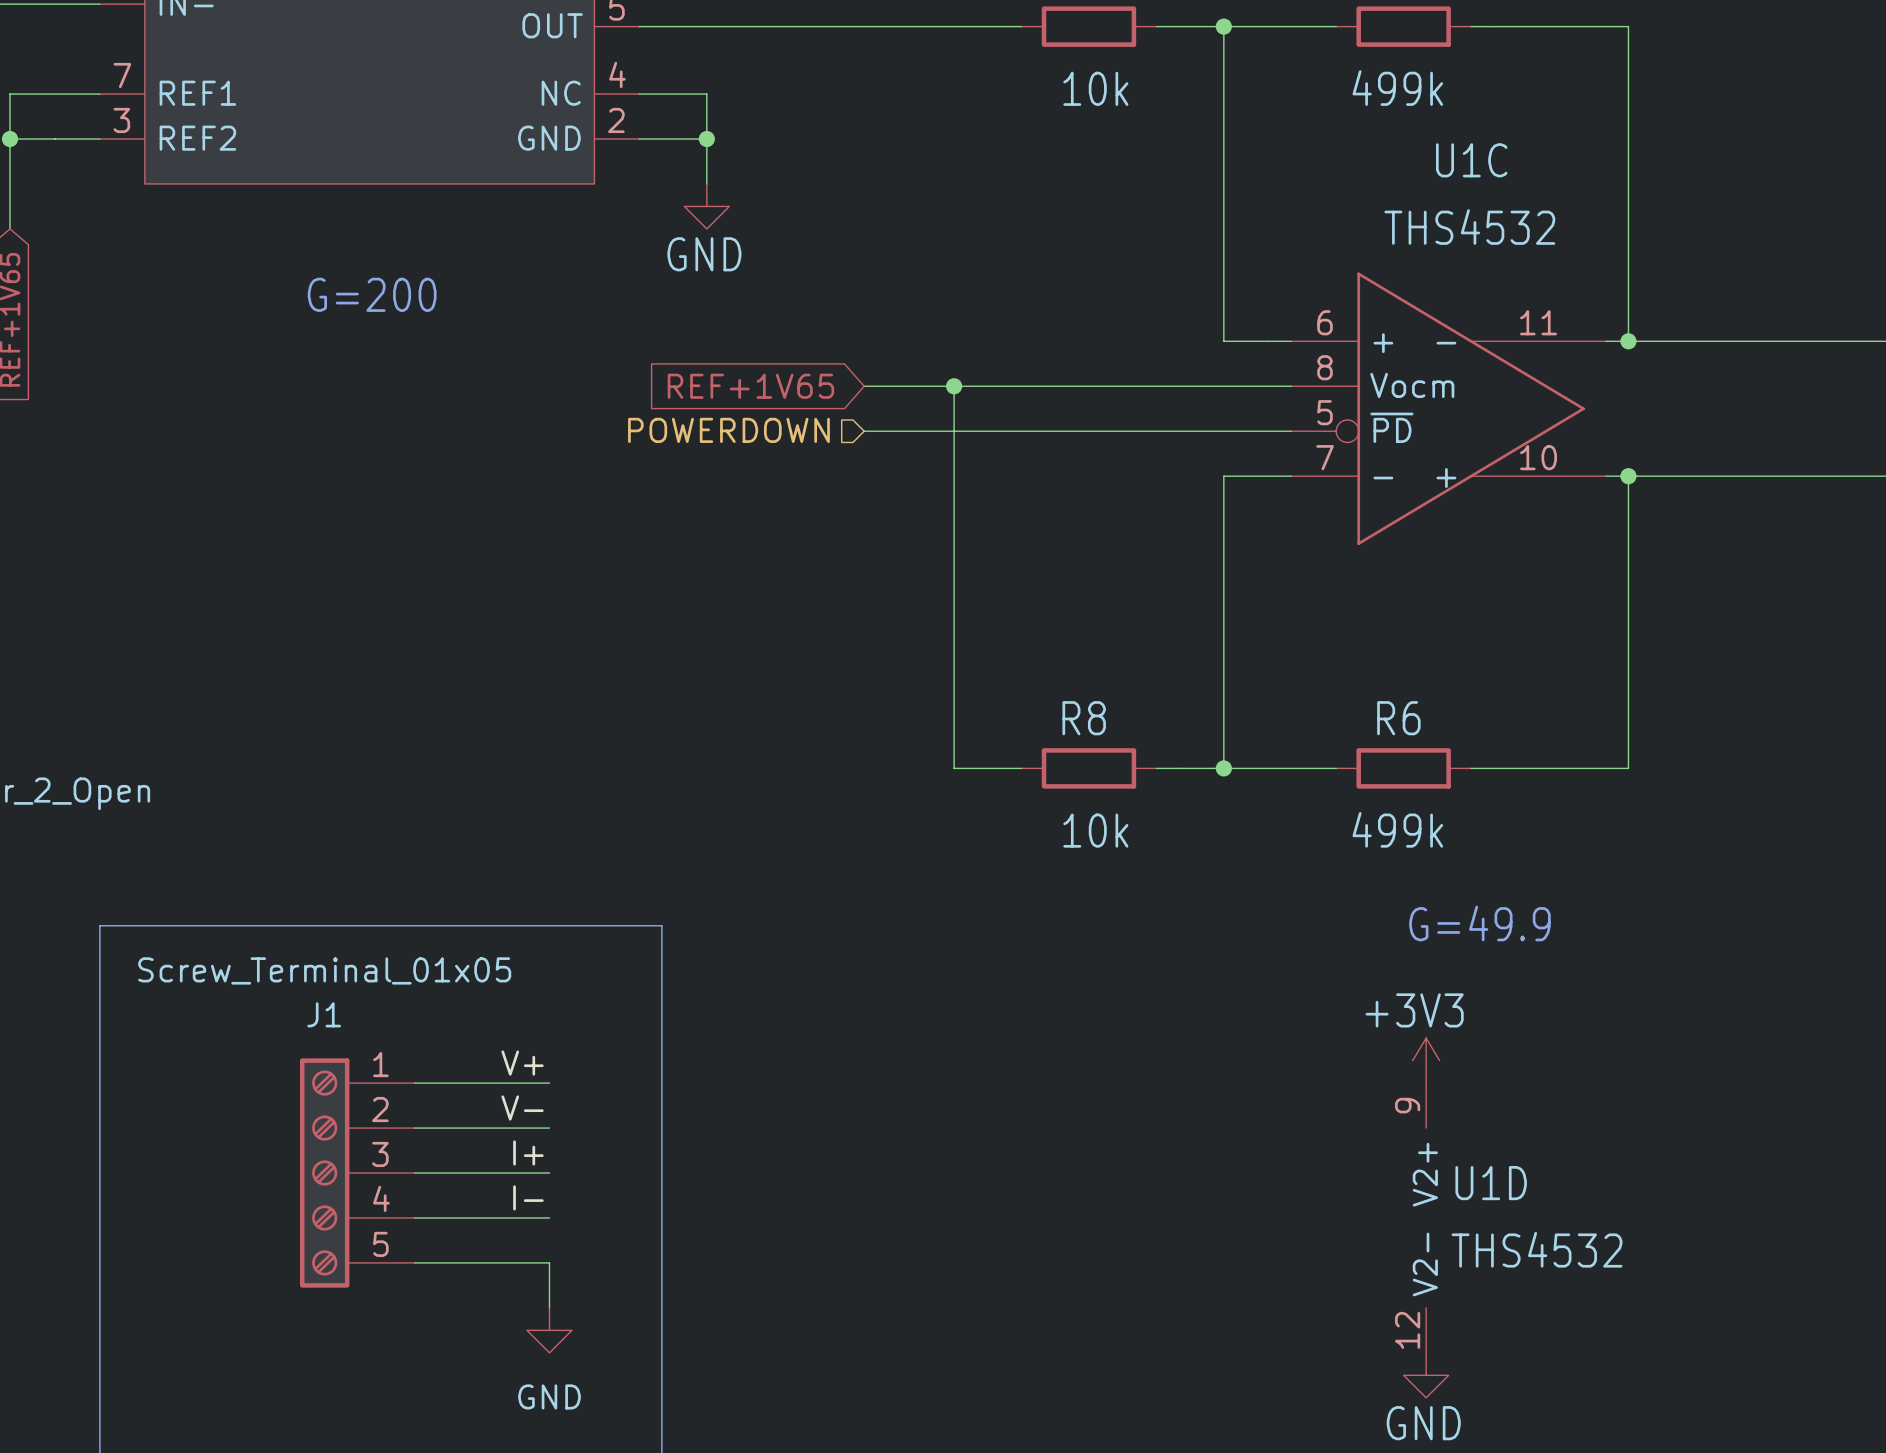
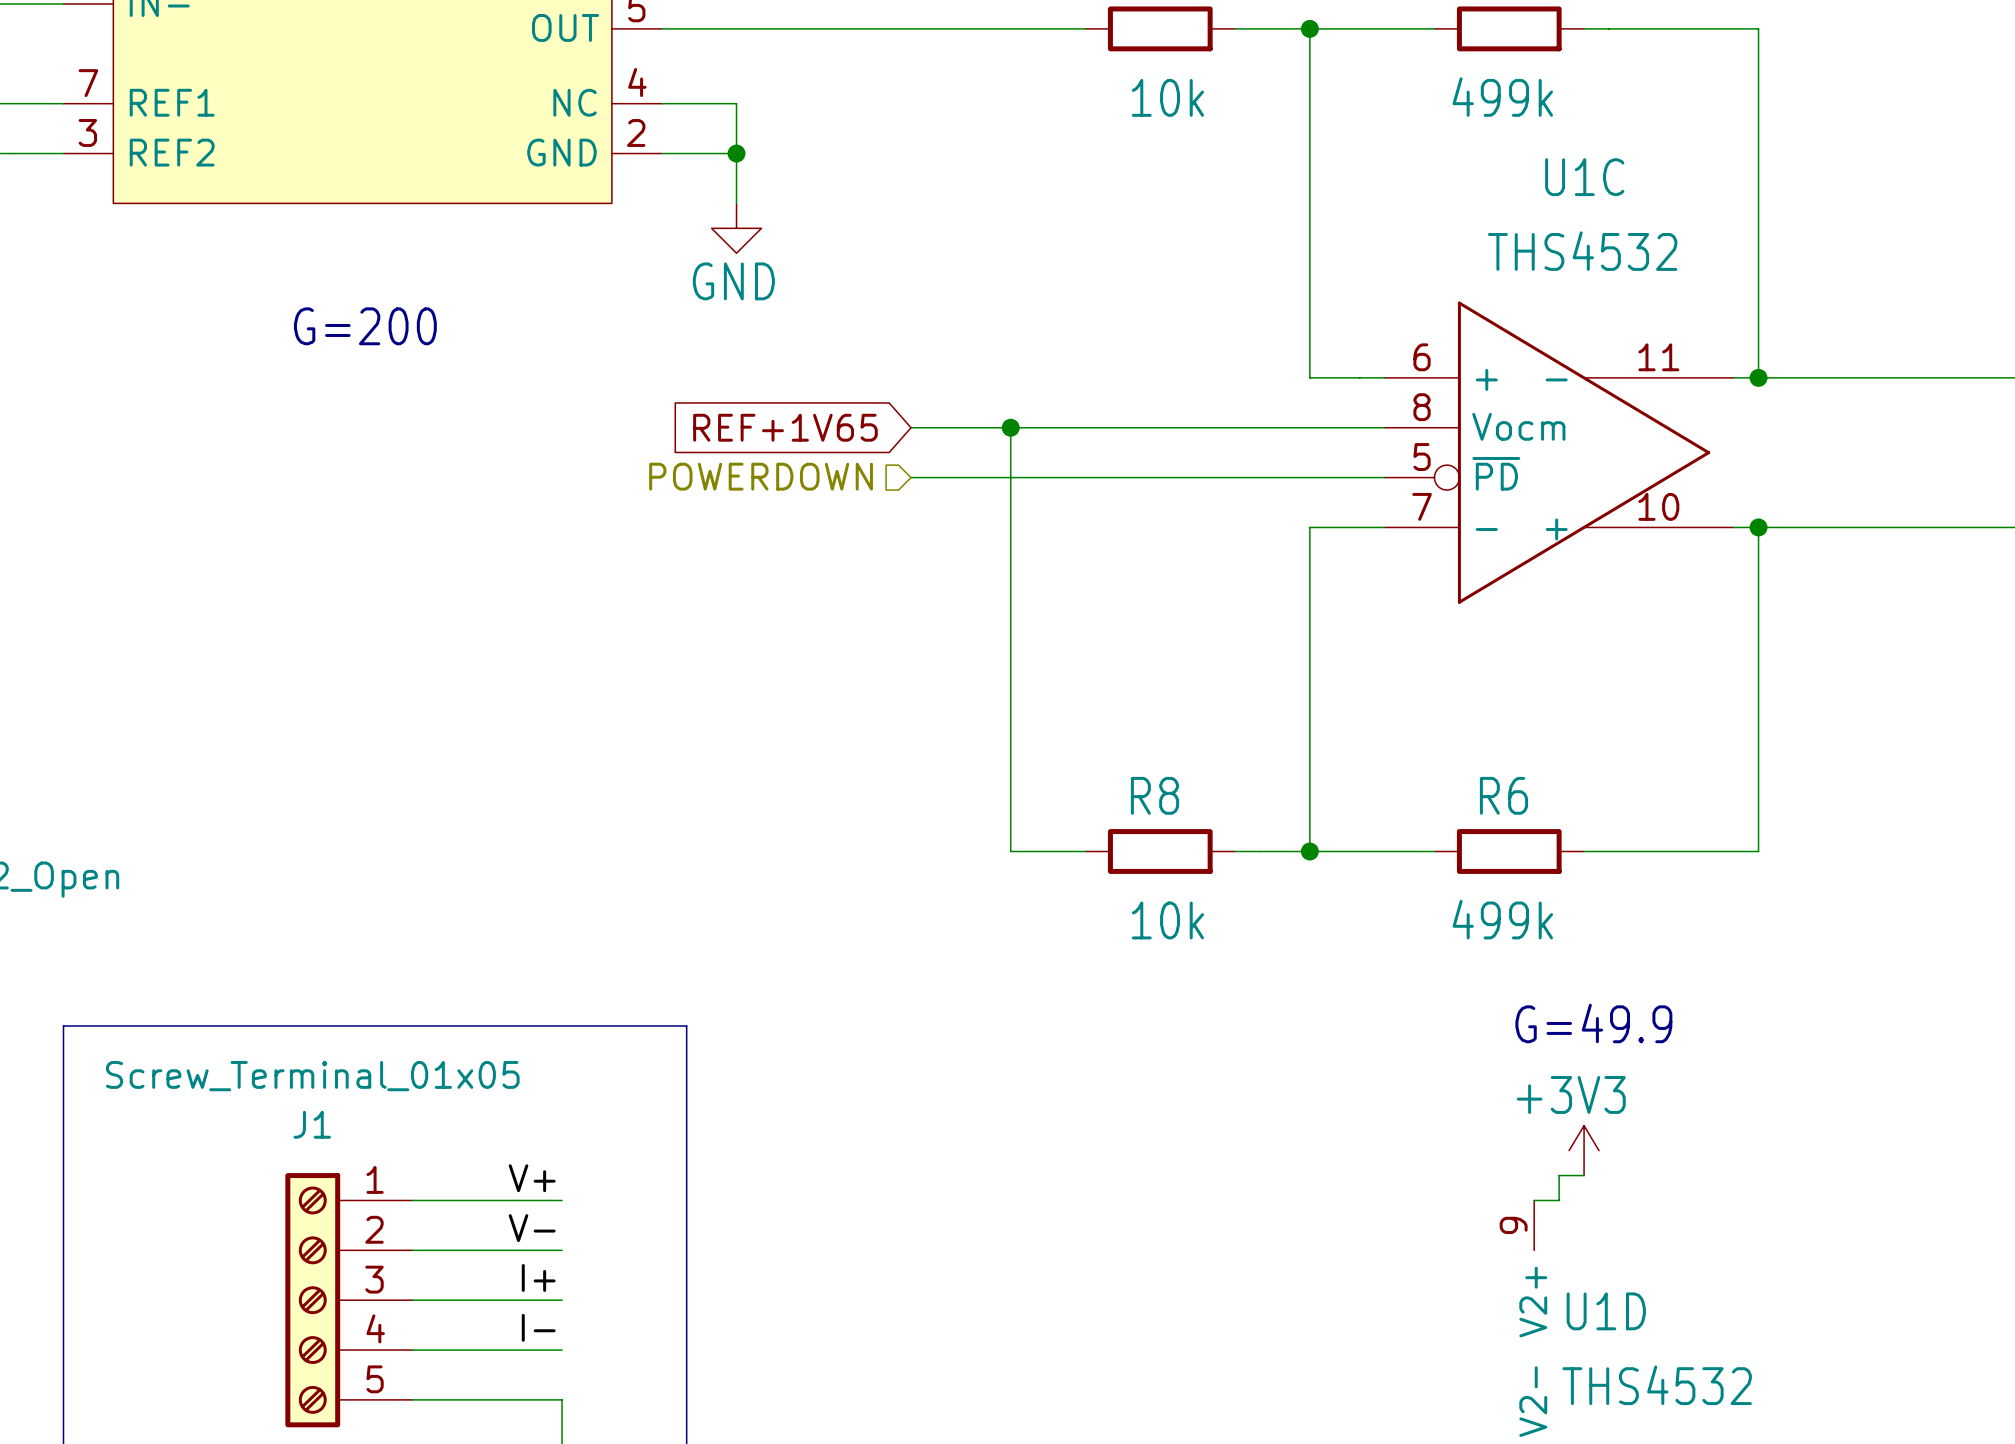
power symbol position: +3V3 (1426, 1060) -> +3V3 (1584, 1150)
wire: none -> (1584, 1175) (1559, 1175) (1559, 1200) (1534, 1200)

